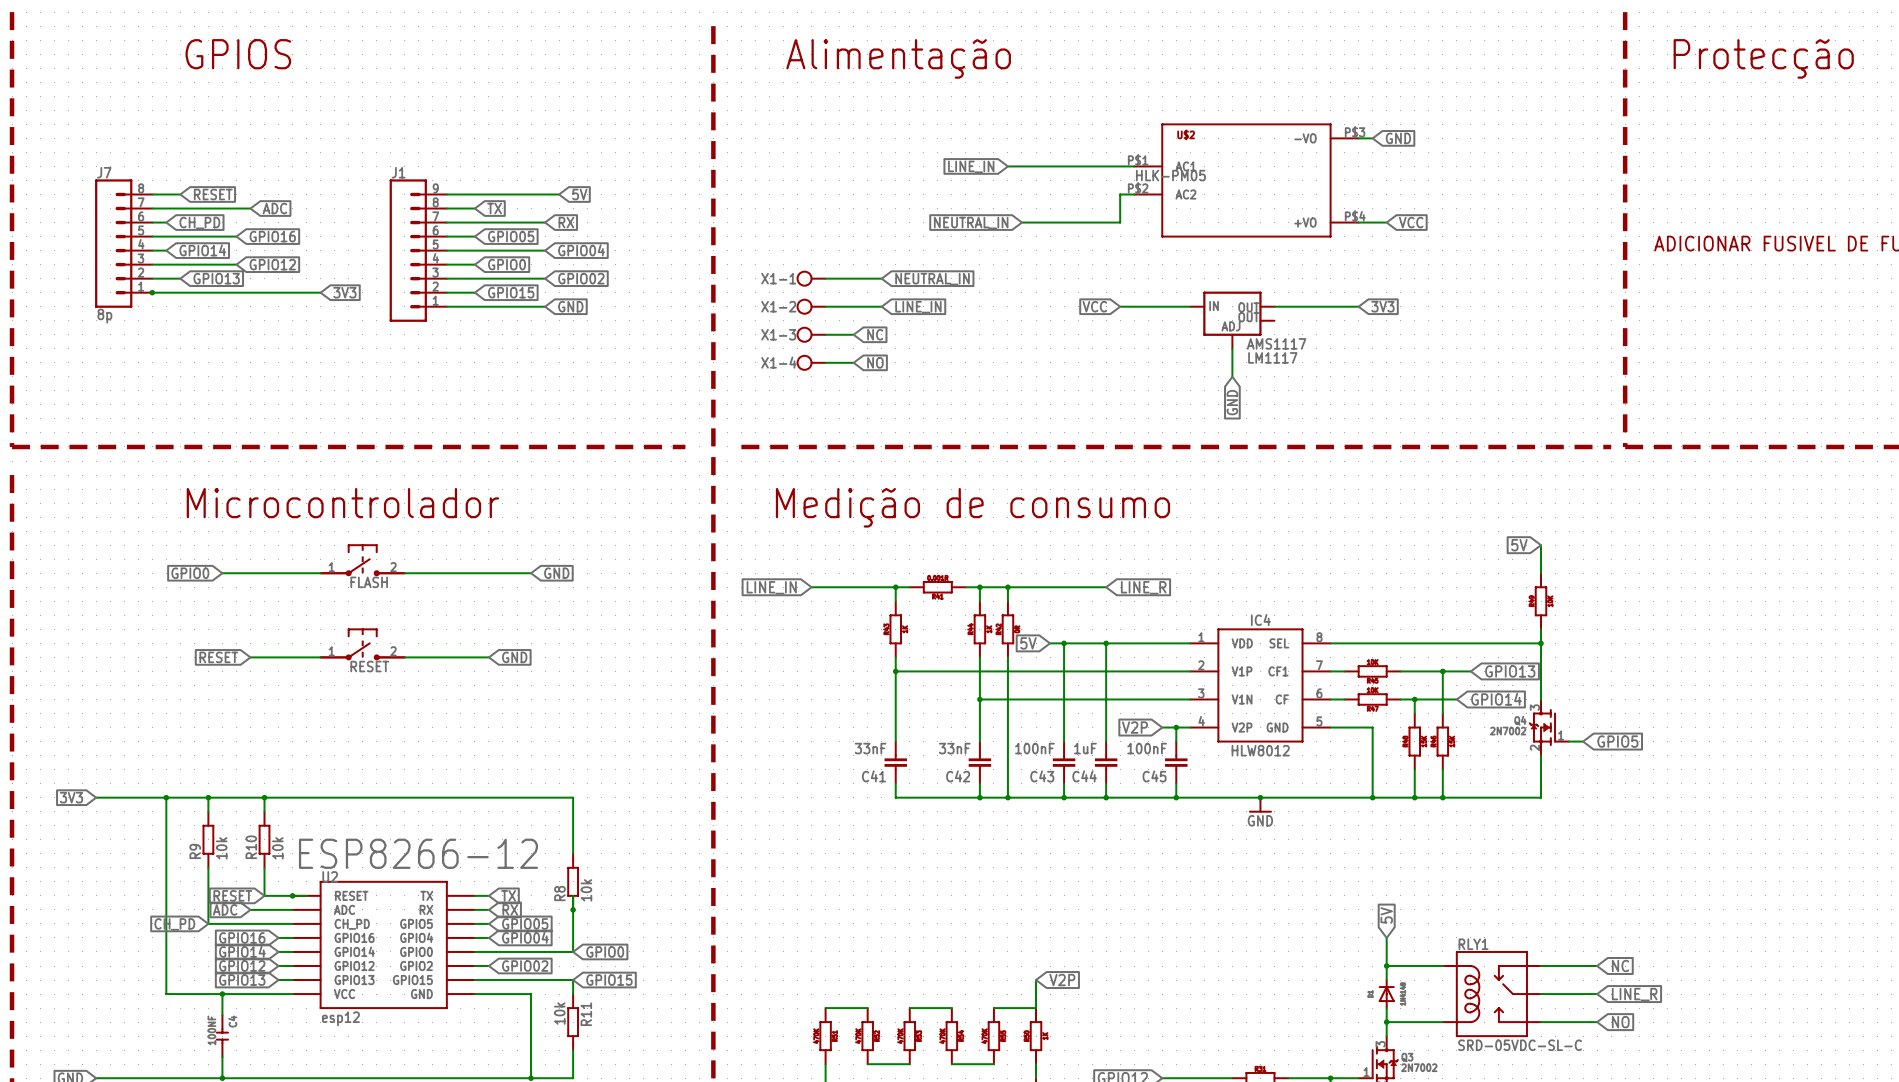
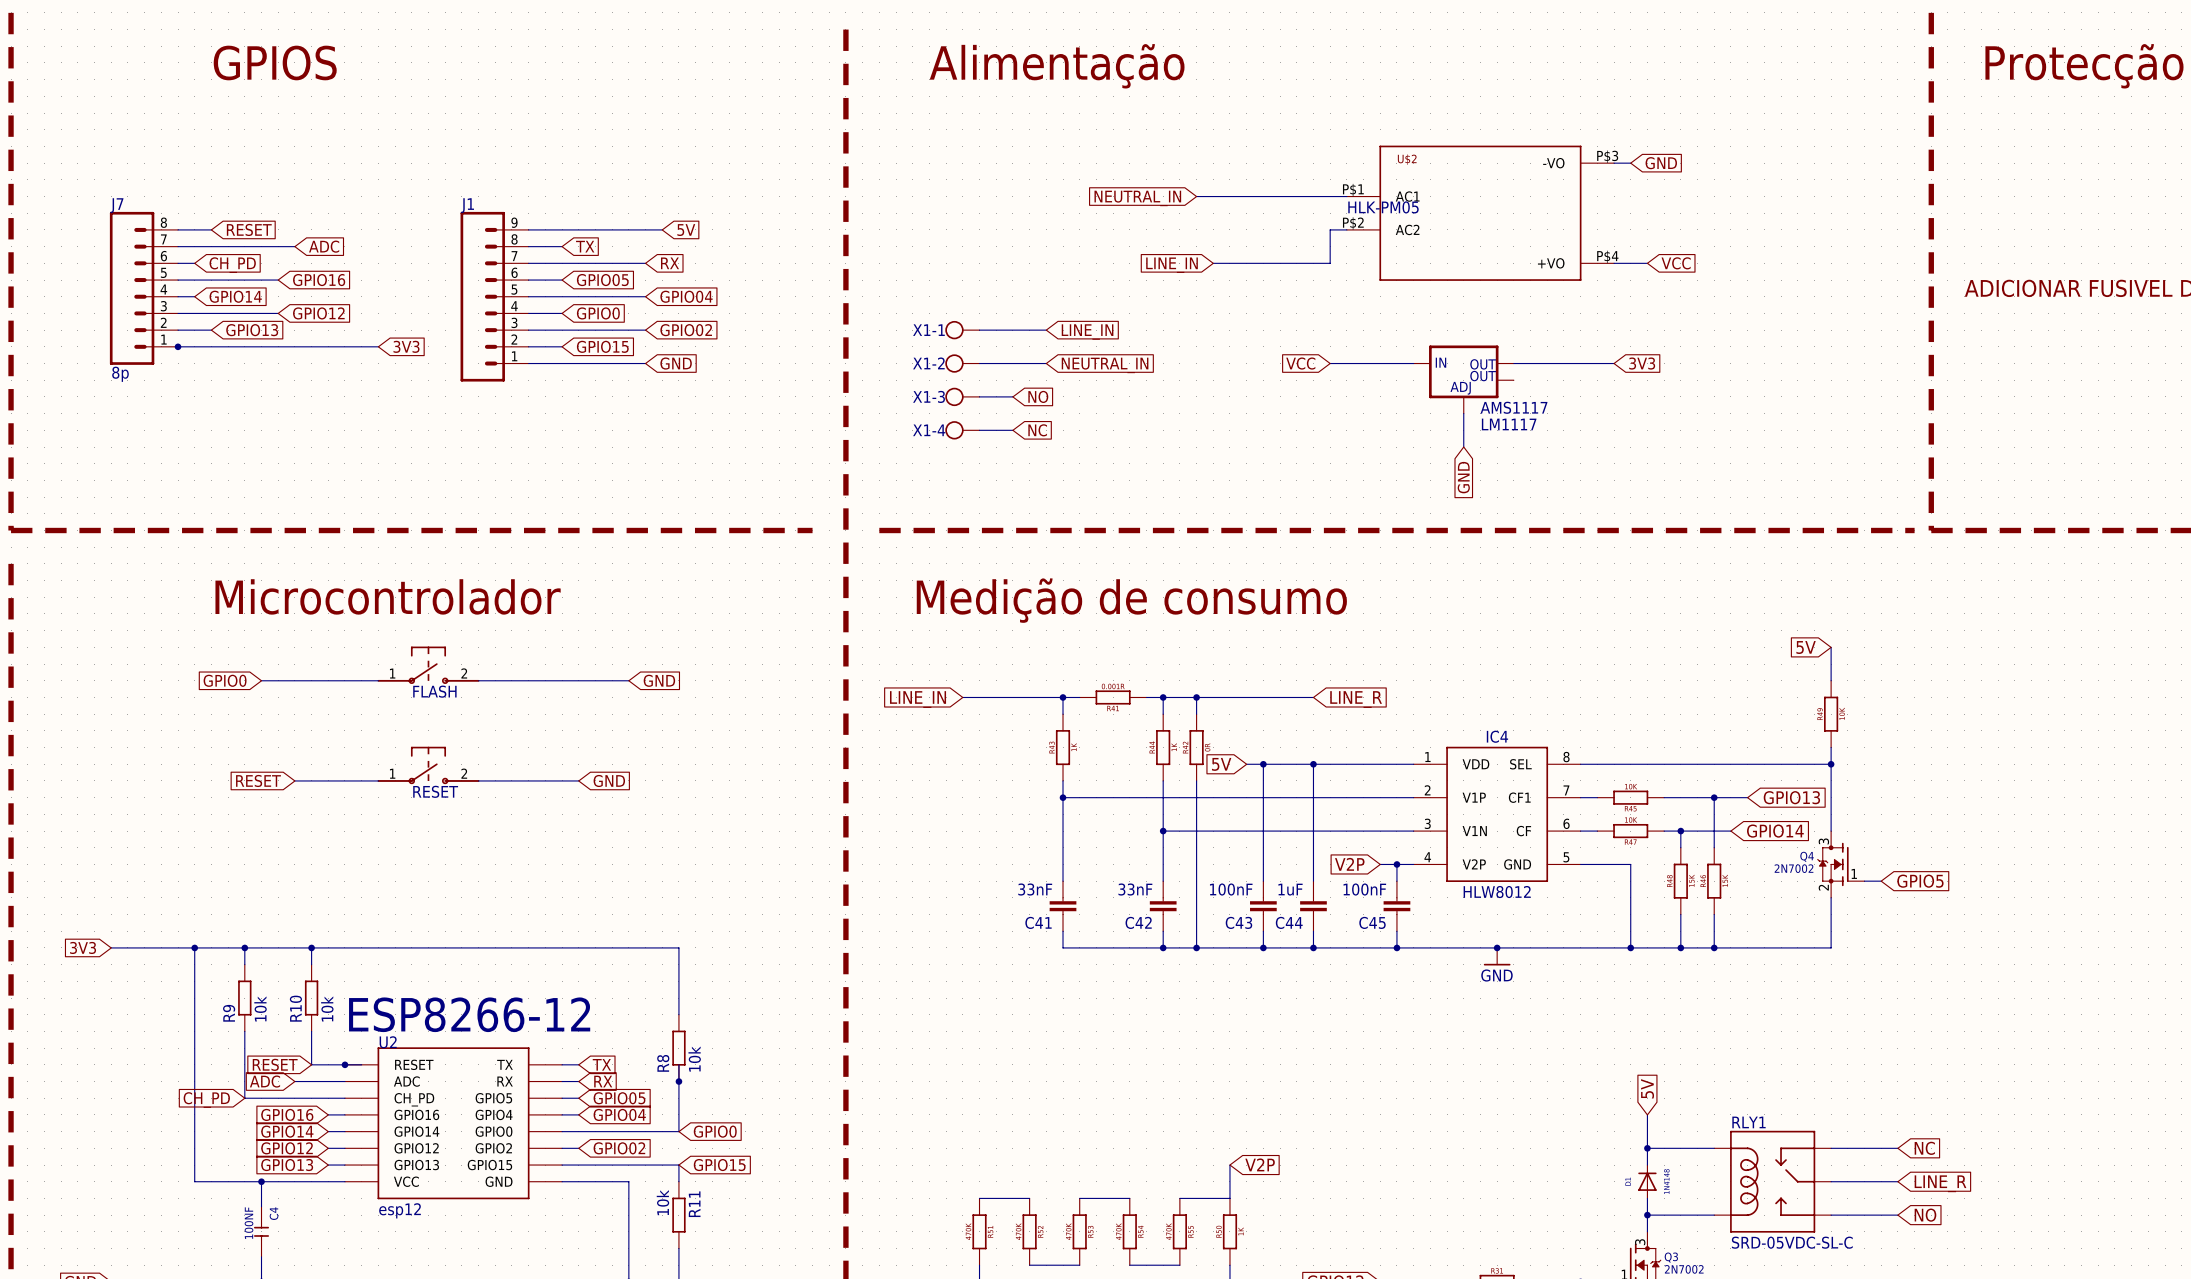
global label: LINE_IN (971, 166) -> NEUTRAL_IN (1137, 198)
global label: NEUTRAL_IN (971, 223) -> LINE_IN (1172, 265)
global label: NEUTRAL_IN (932, 279) -> LINE_IN (1087, 332)
global label: LINE_IN (918, 307) -> NEUTRAL_IN (1105, 365)
global label: NC (875, 334) -> NO (1038, 396)
global label: NO (875, 362) -> NC (1037, 430)

